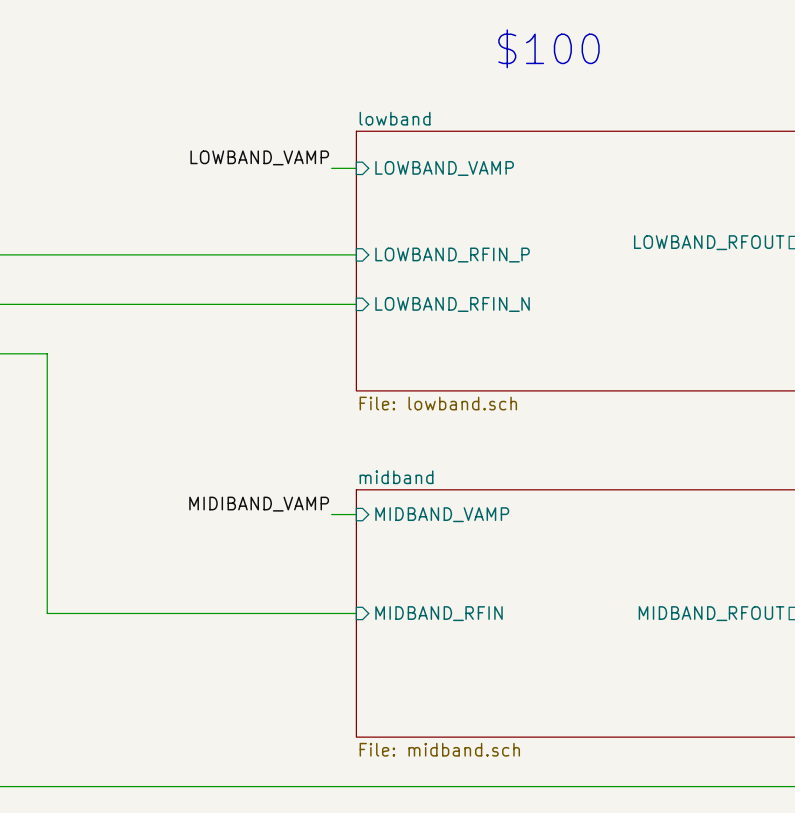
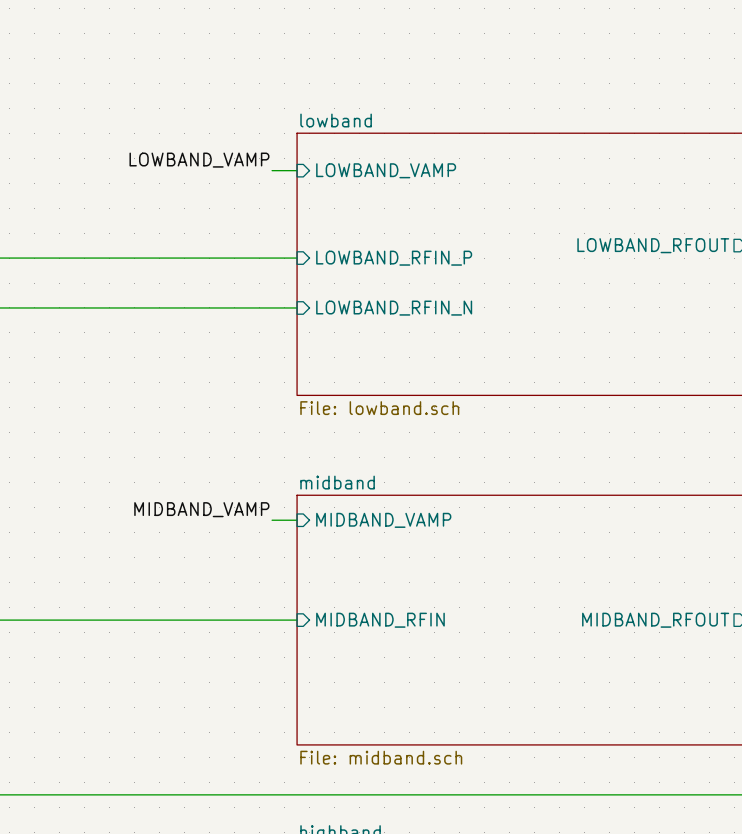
text: $100 (548, 48) -> none
label: MIDIBAND_VAMP (259, 504) -> MIDBAND_VAMP (201, 509)

